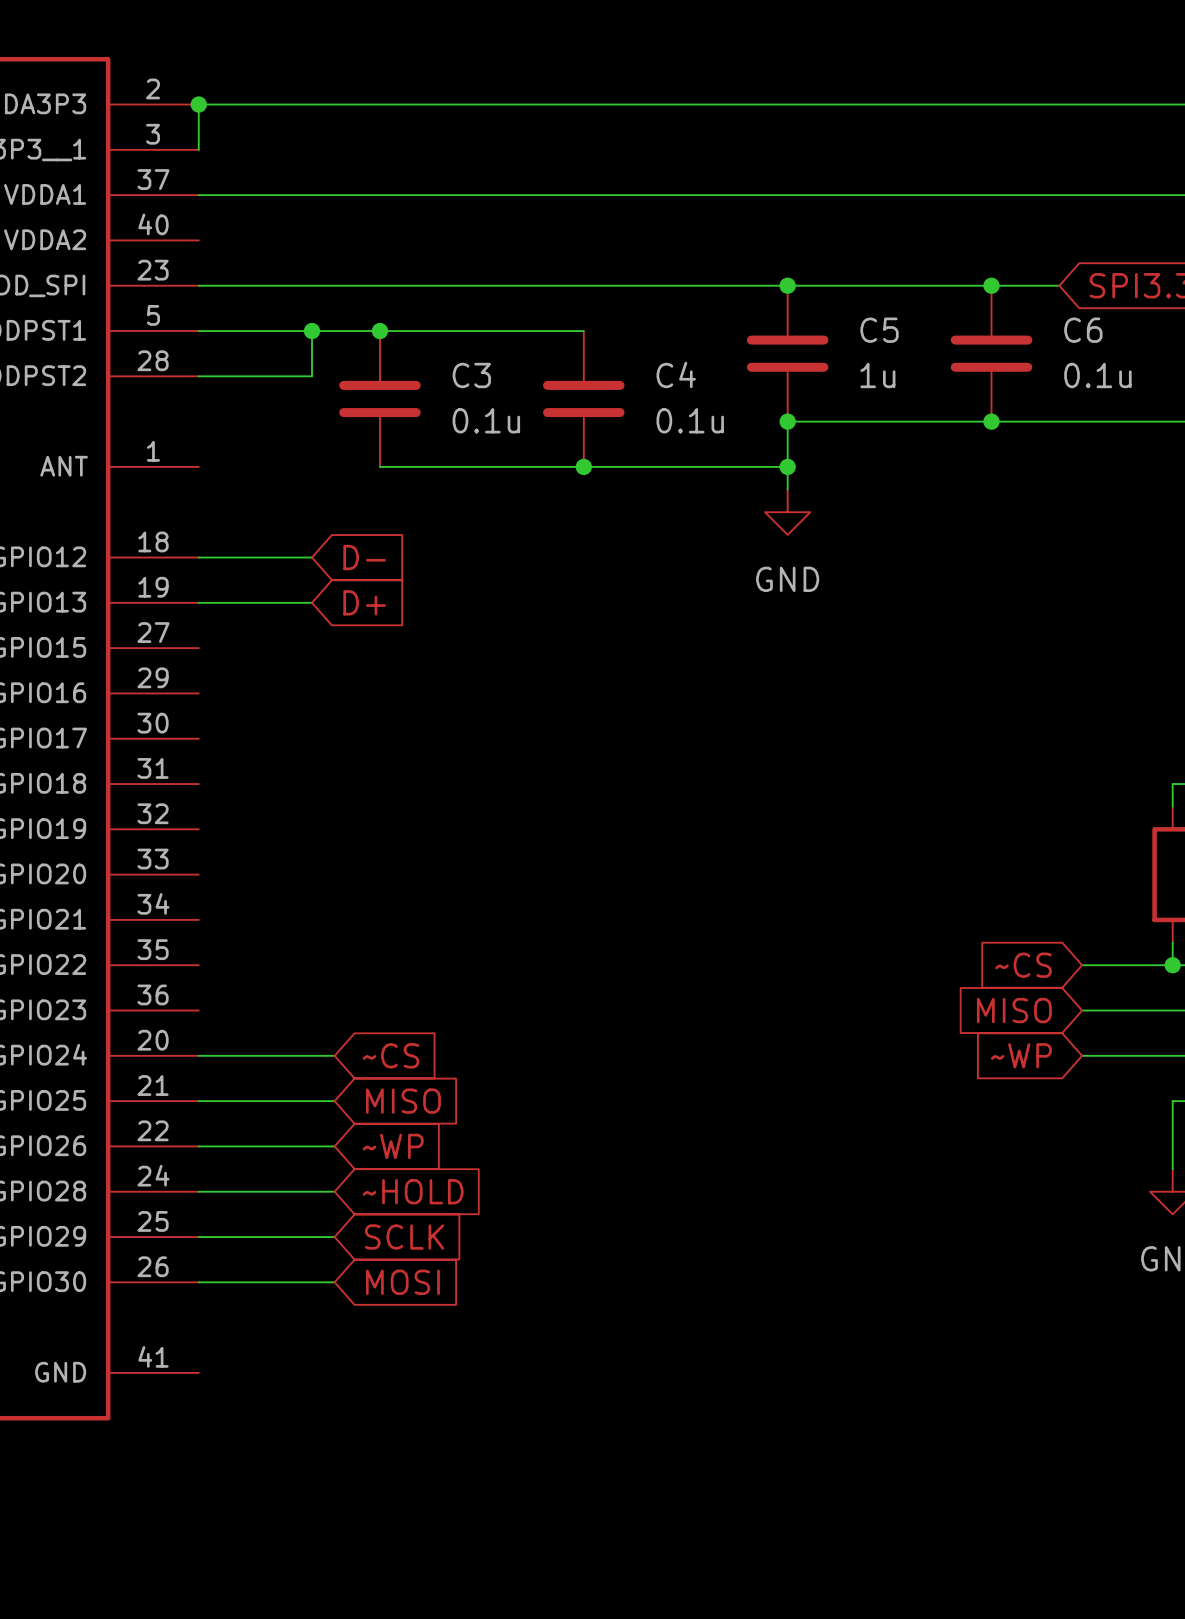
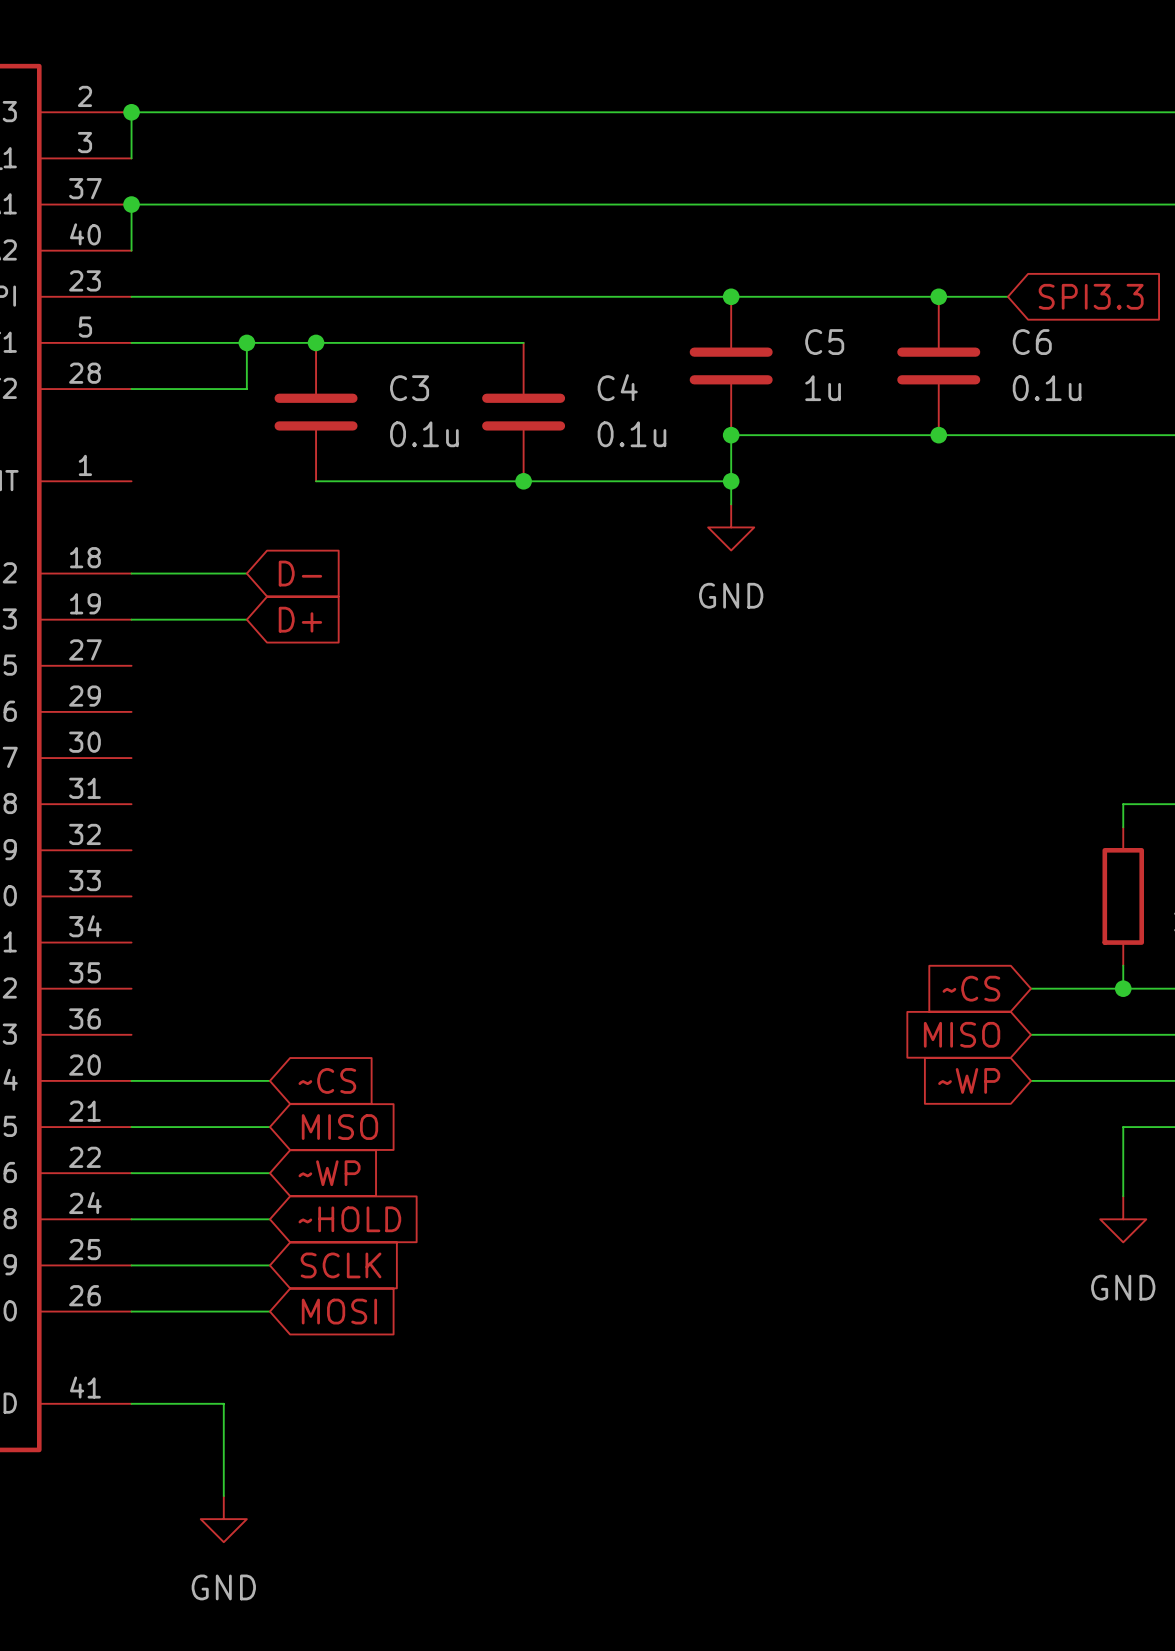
wire: none -> (131, 204) (131, 250)
junction: none -> (131, 204)
wire: none -> (131, 1403) (223, 1403) (223, 1496)
power symbol: none -> GND (223, 1519)

